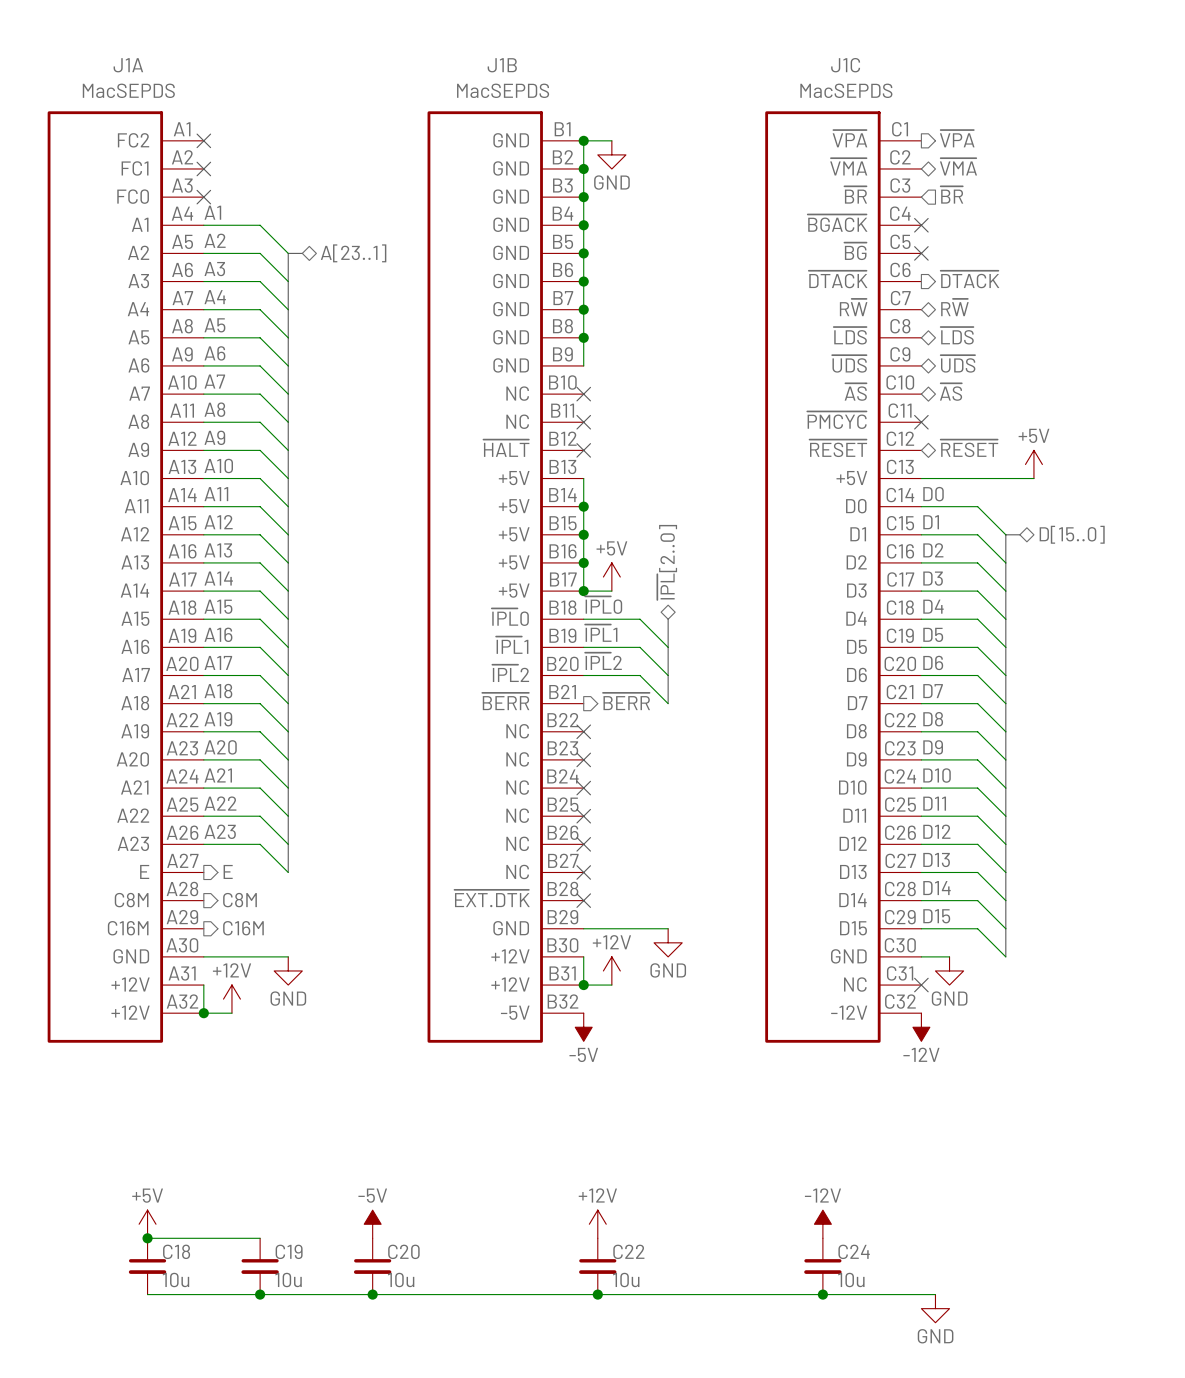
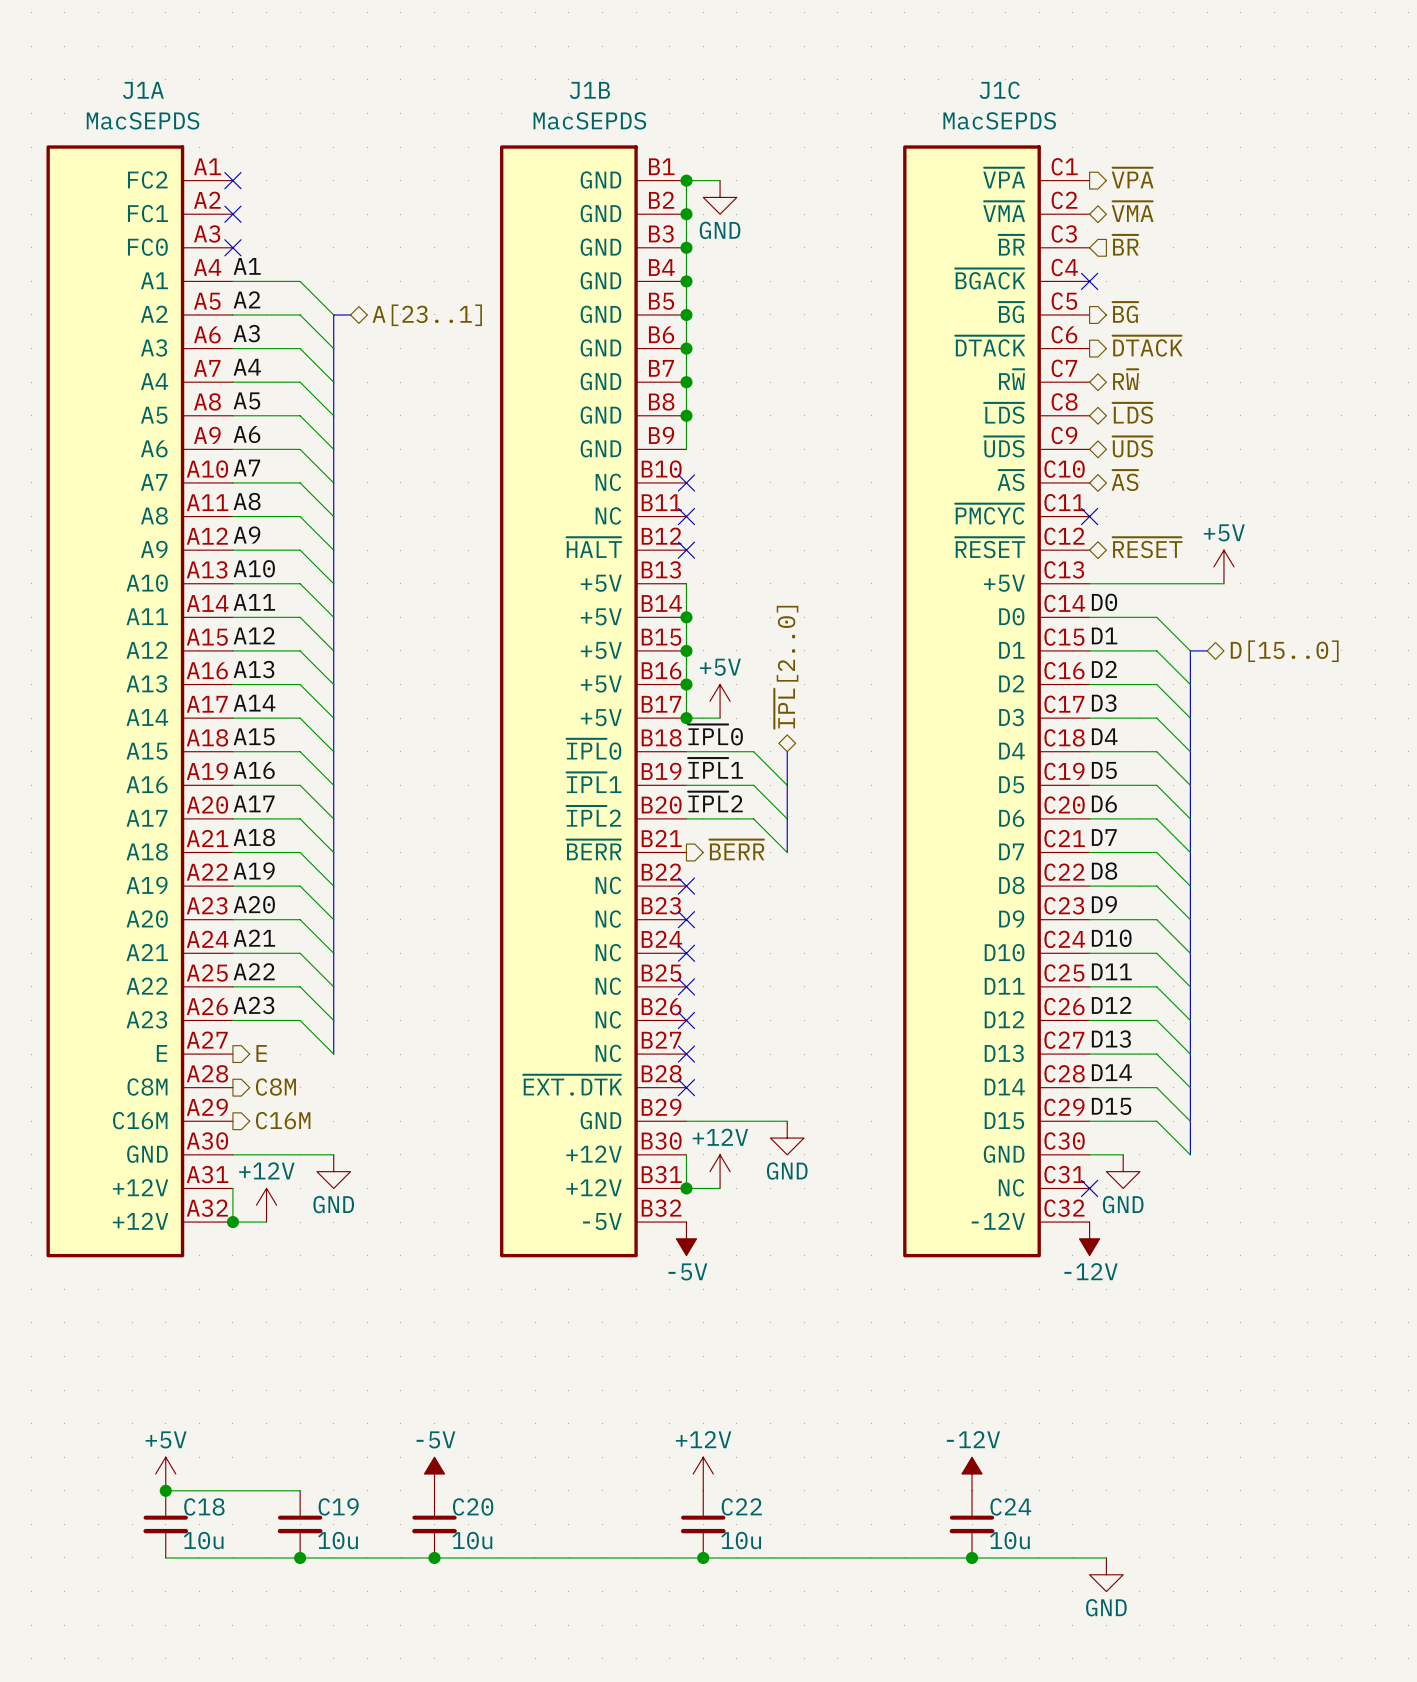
hierarchical label: none -> ~{BG} (1125, 312)
no-connect mark: (921, 253) -> none

